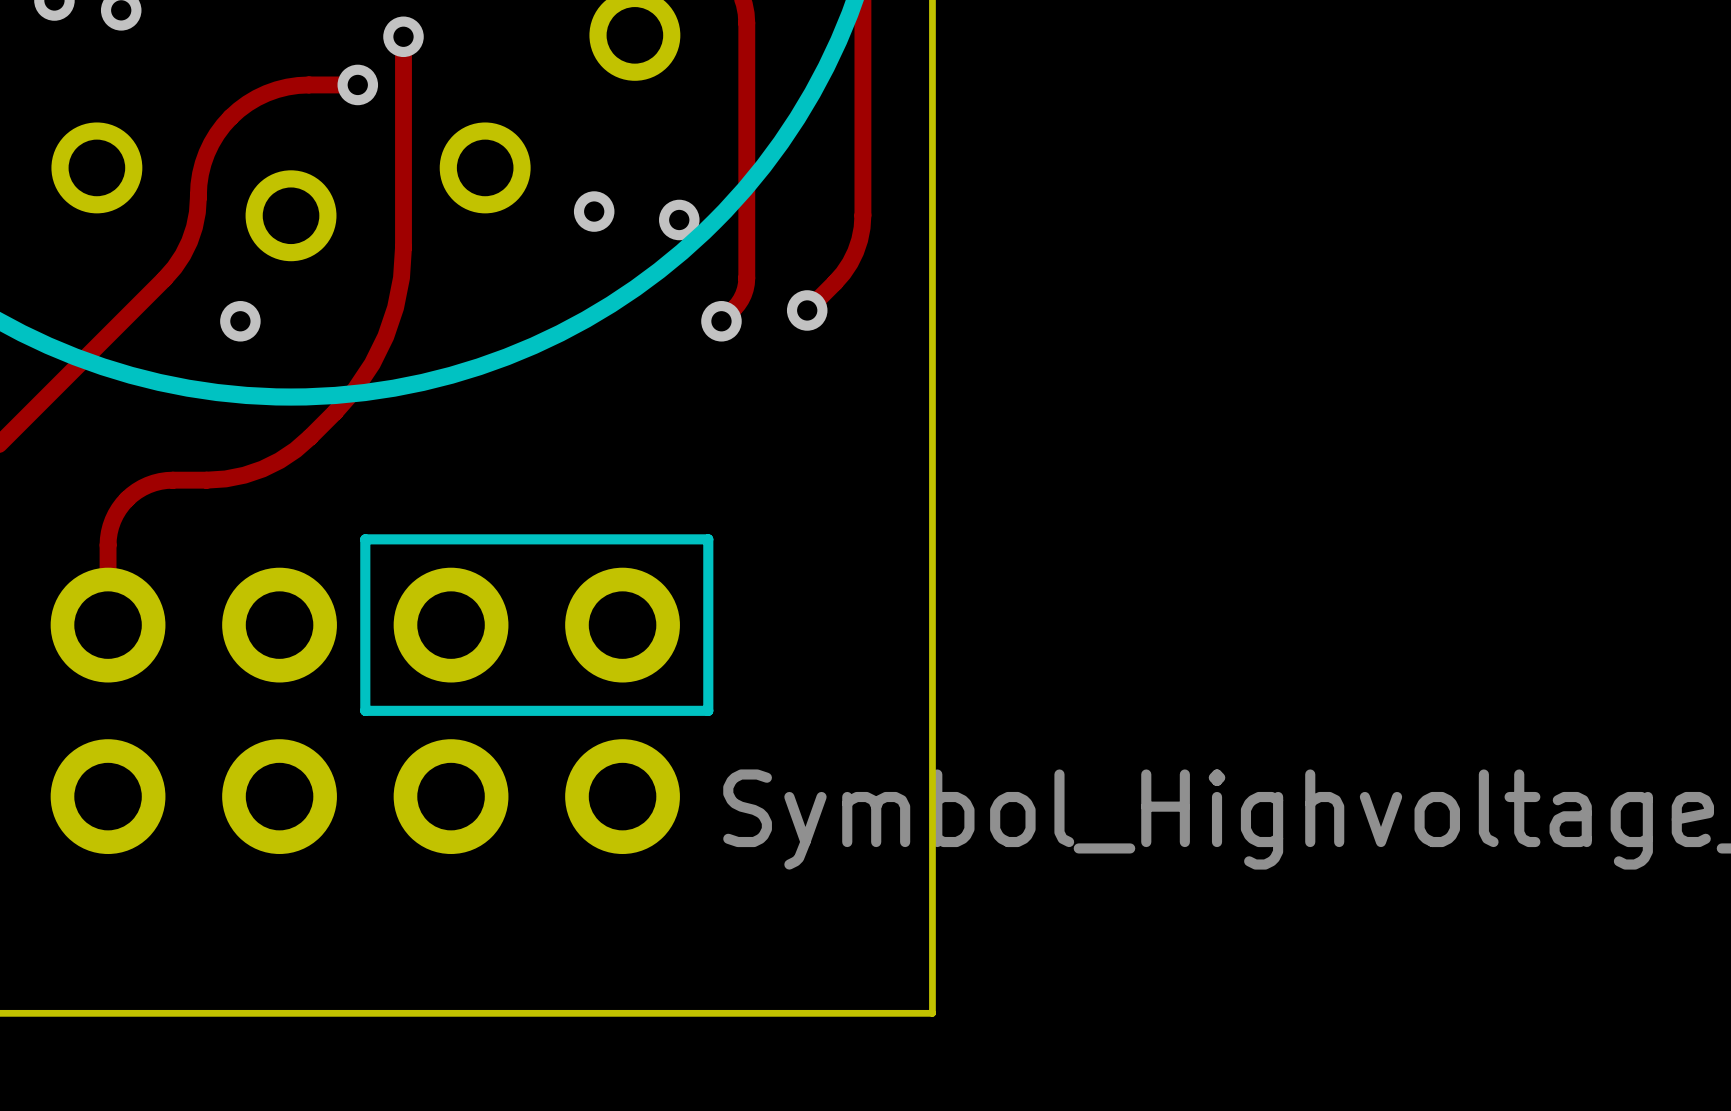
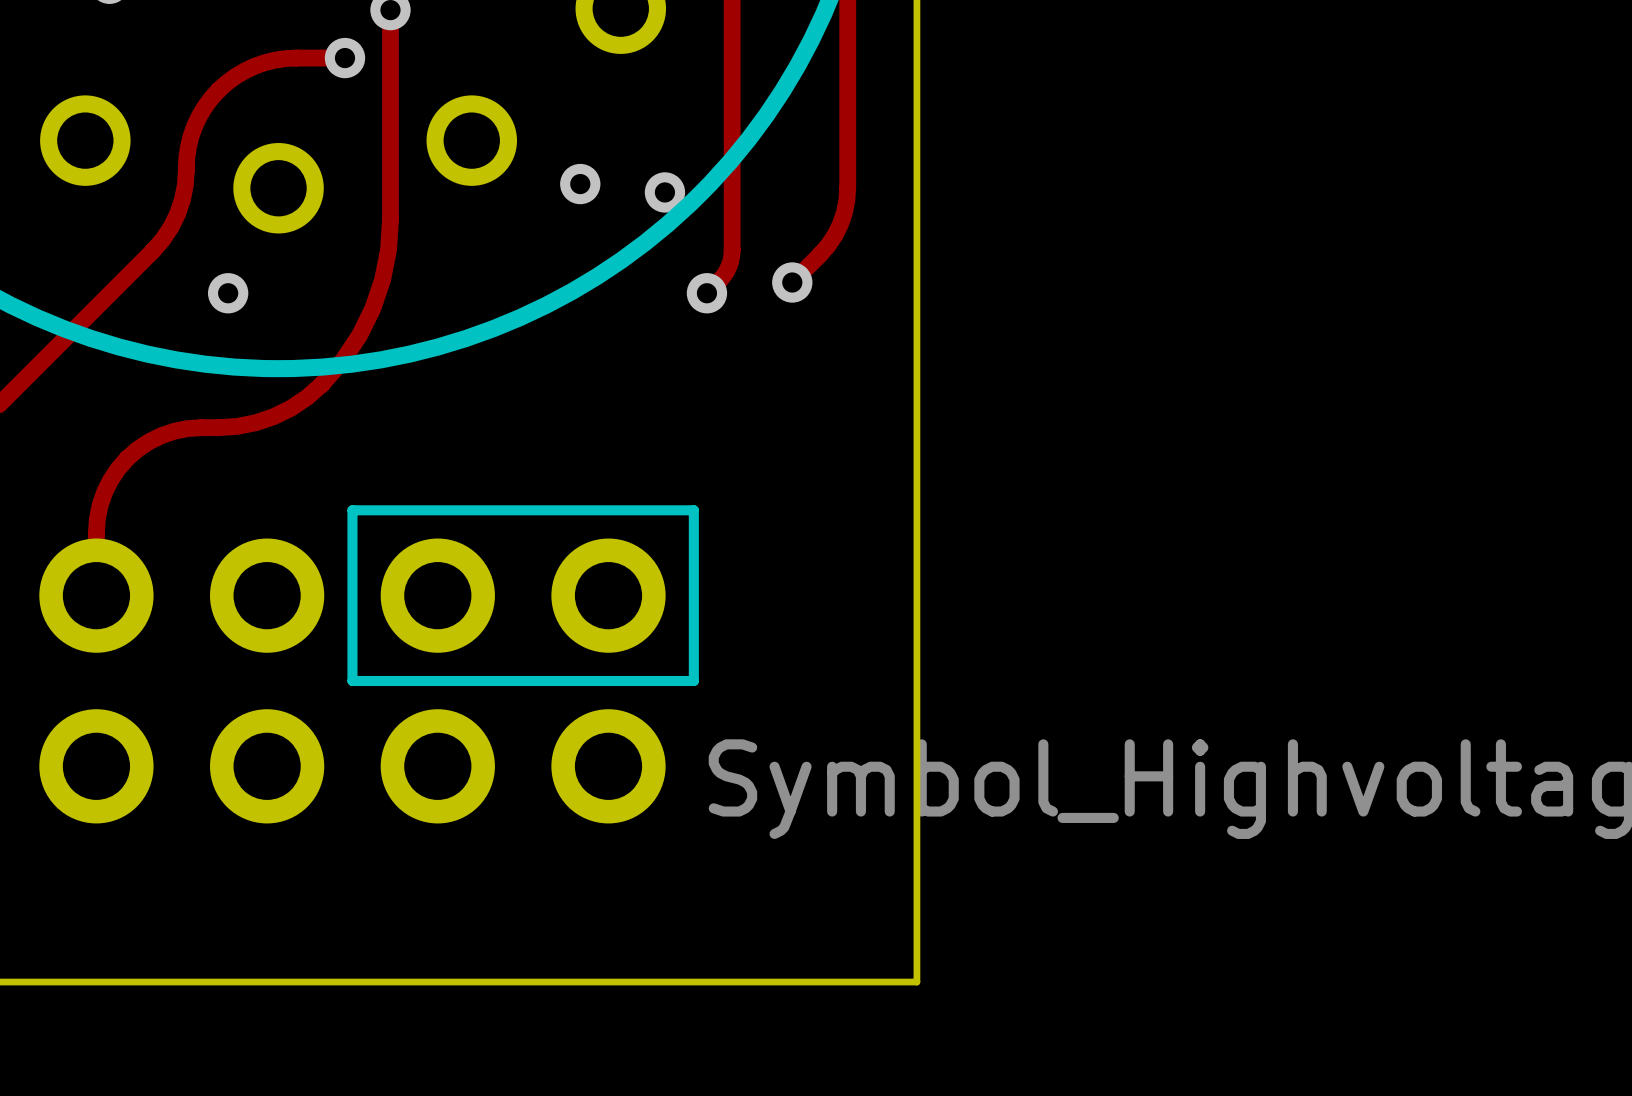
track: (333, 413) (295, 449) (262, 469) (225, 478) (160, 481) (136, 491) (122, 503) (112, 520) (108, 538) (108, 562) -> (321, 385) (291, 408) (255, 422) (237, 426) (187, 428) (161, 435) (149, 441) (127, 458) (110, 480) (100, 505) (96, 532)

